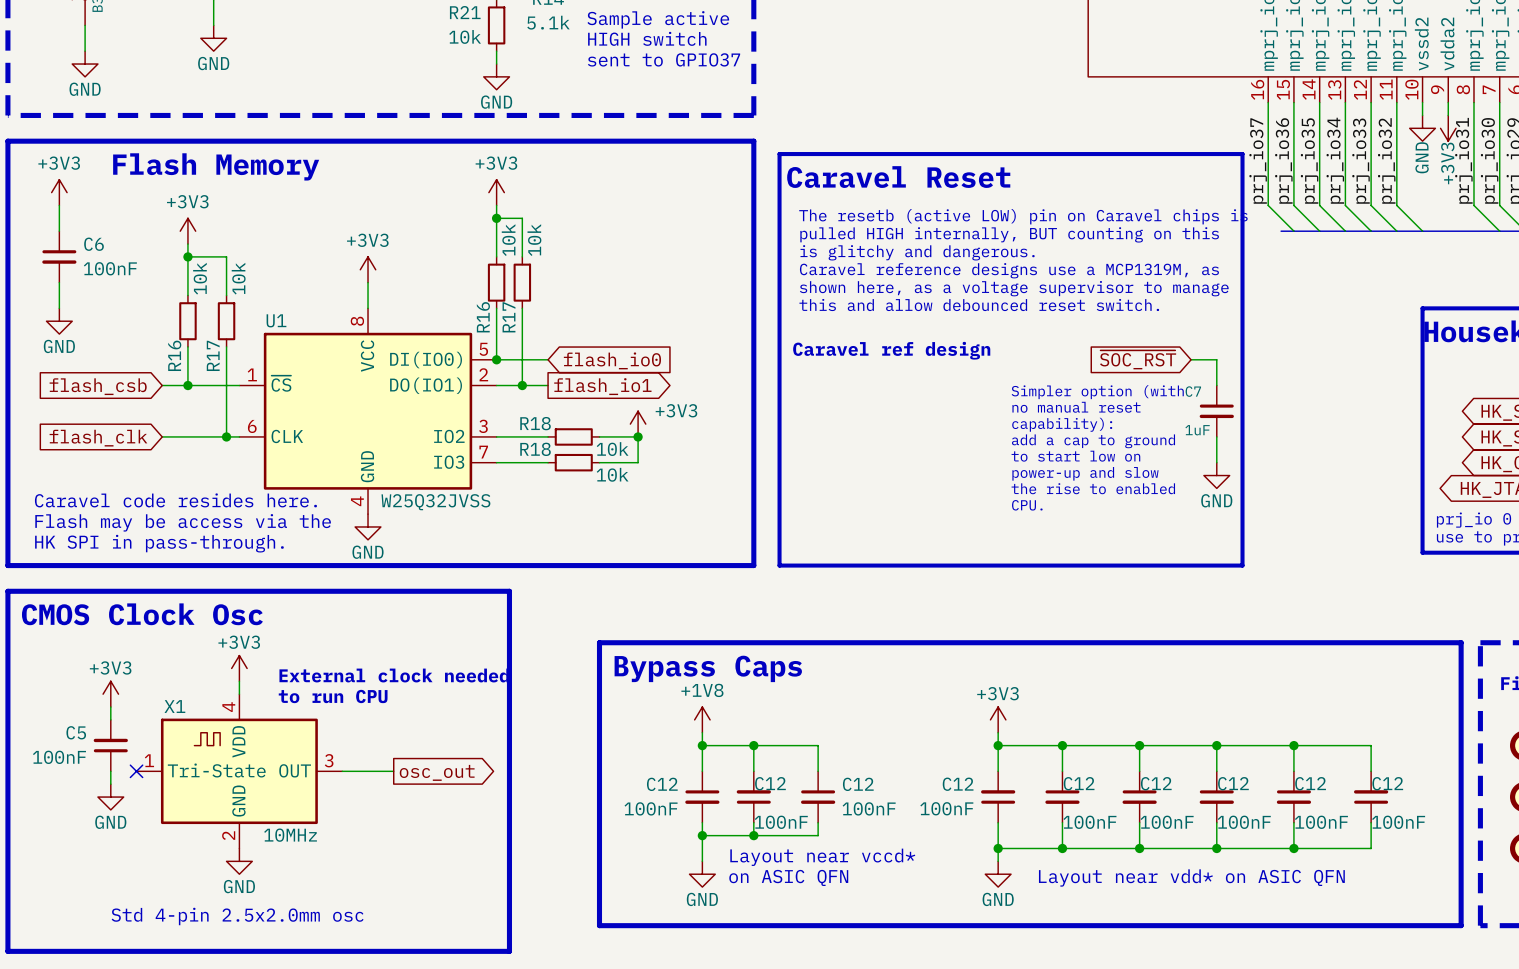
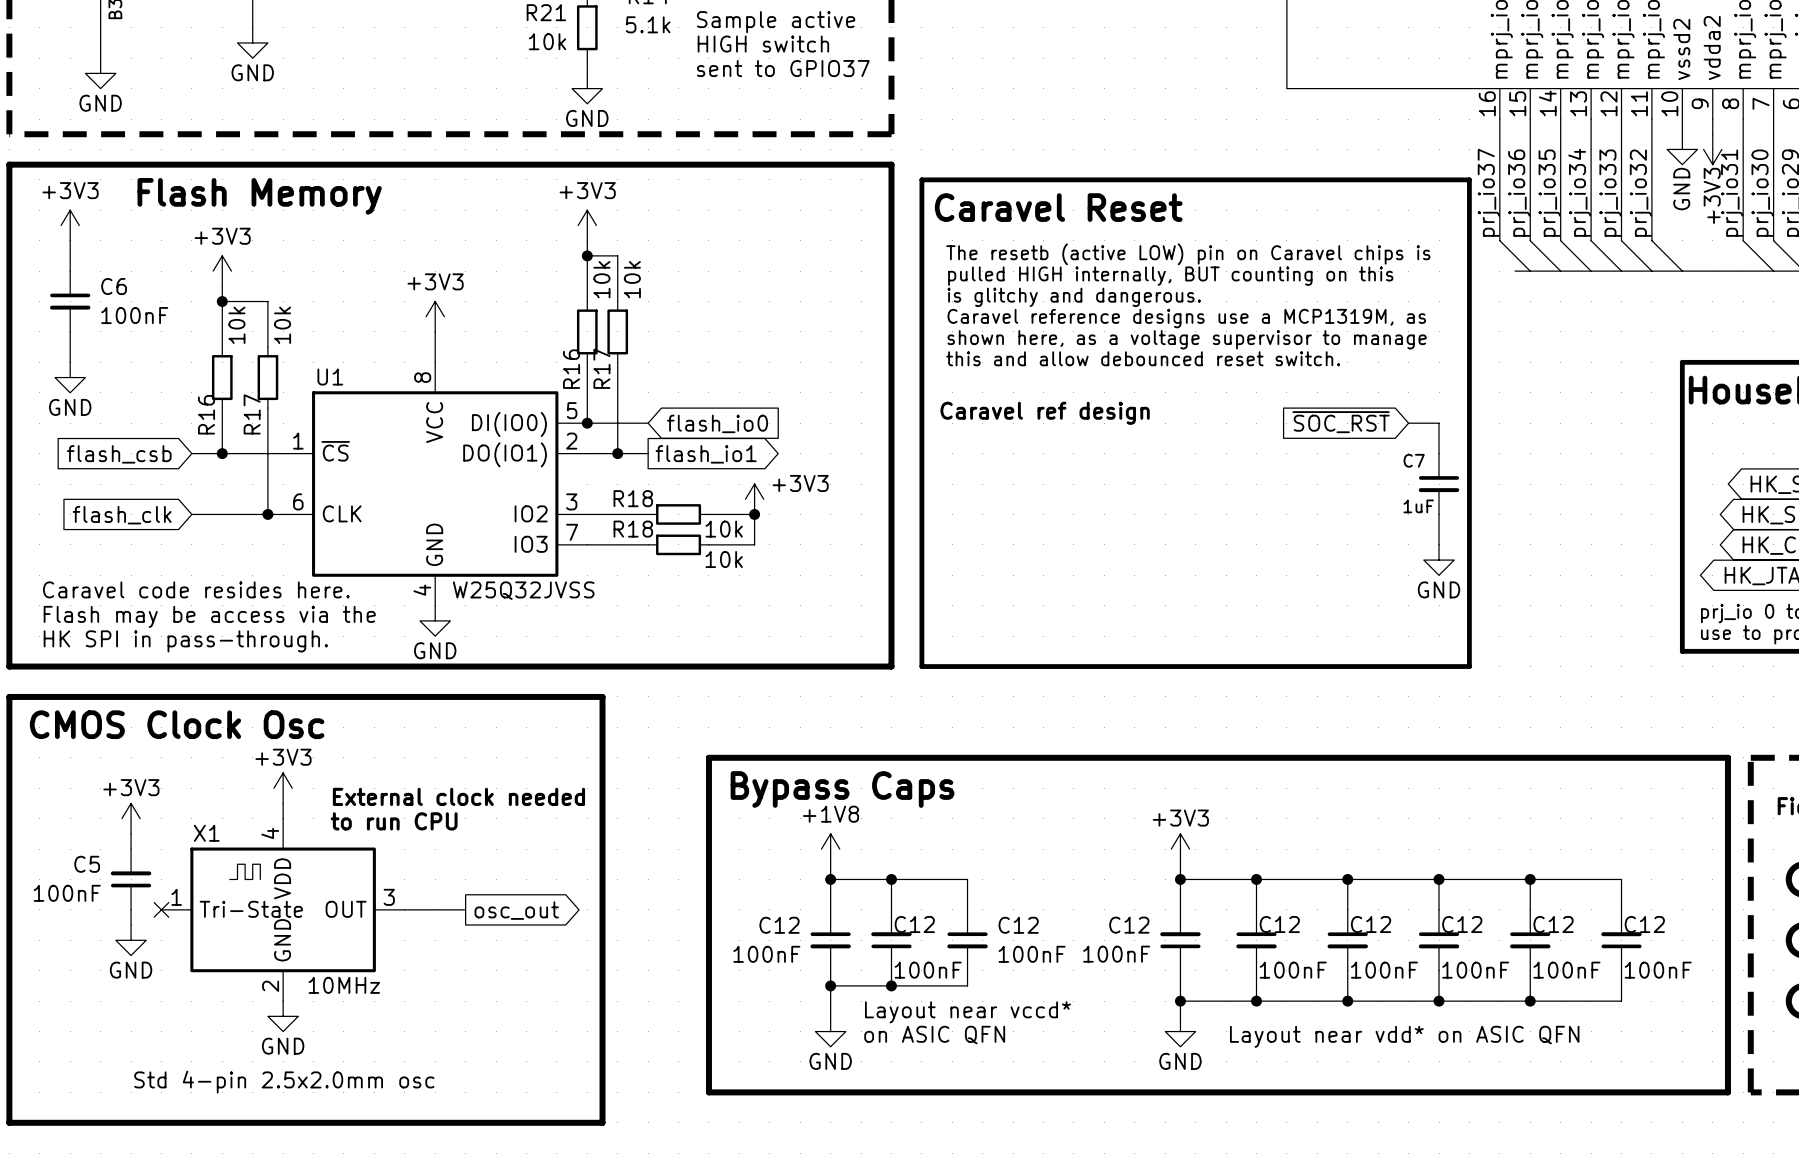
text: Simpler option (with (1097, 392) -> none
text: no manual reset (1076, 407) -> none
text: capability): (1062, 424) -> none
text: add a cap to ground (1093, 441) -> none
text: to start low on (1075, 456) -> none
text: power-up and slow (1085, 473) -> none
text: the rise to enabled (1093, 488) -> none
text: CPU. (1027, 505) -> none

